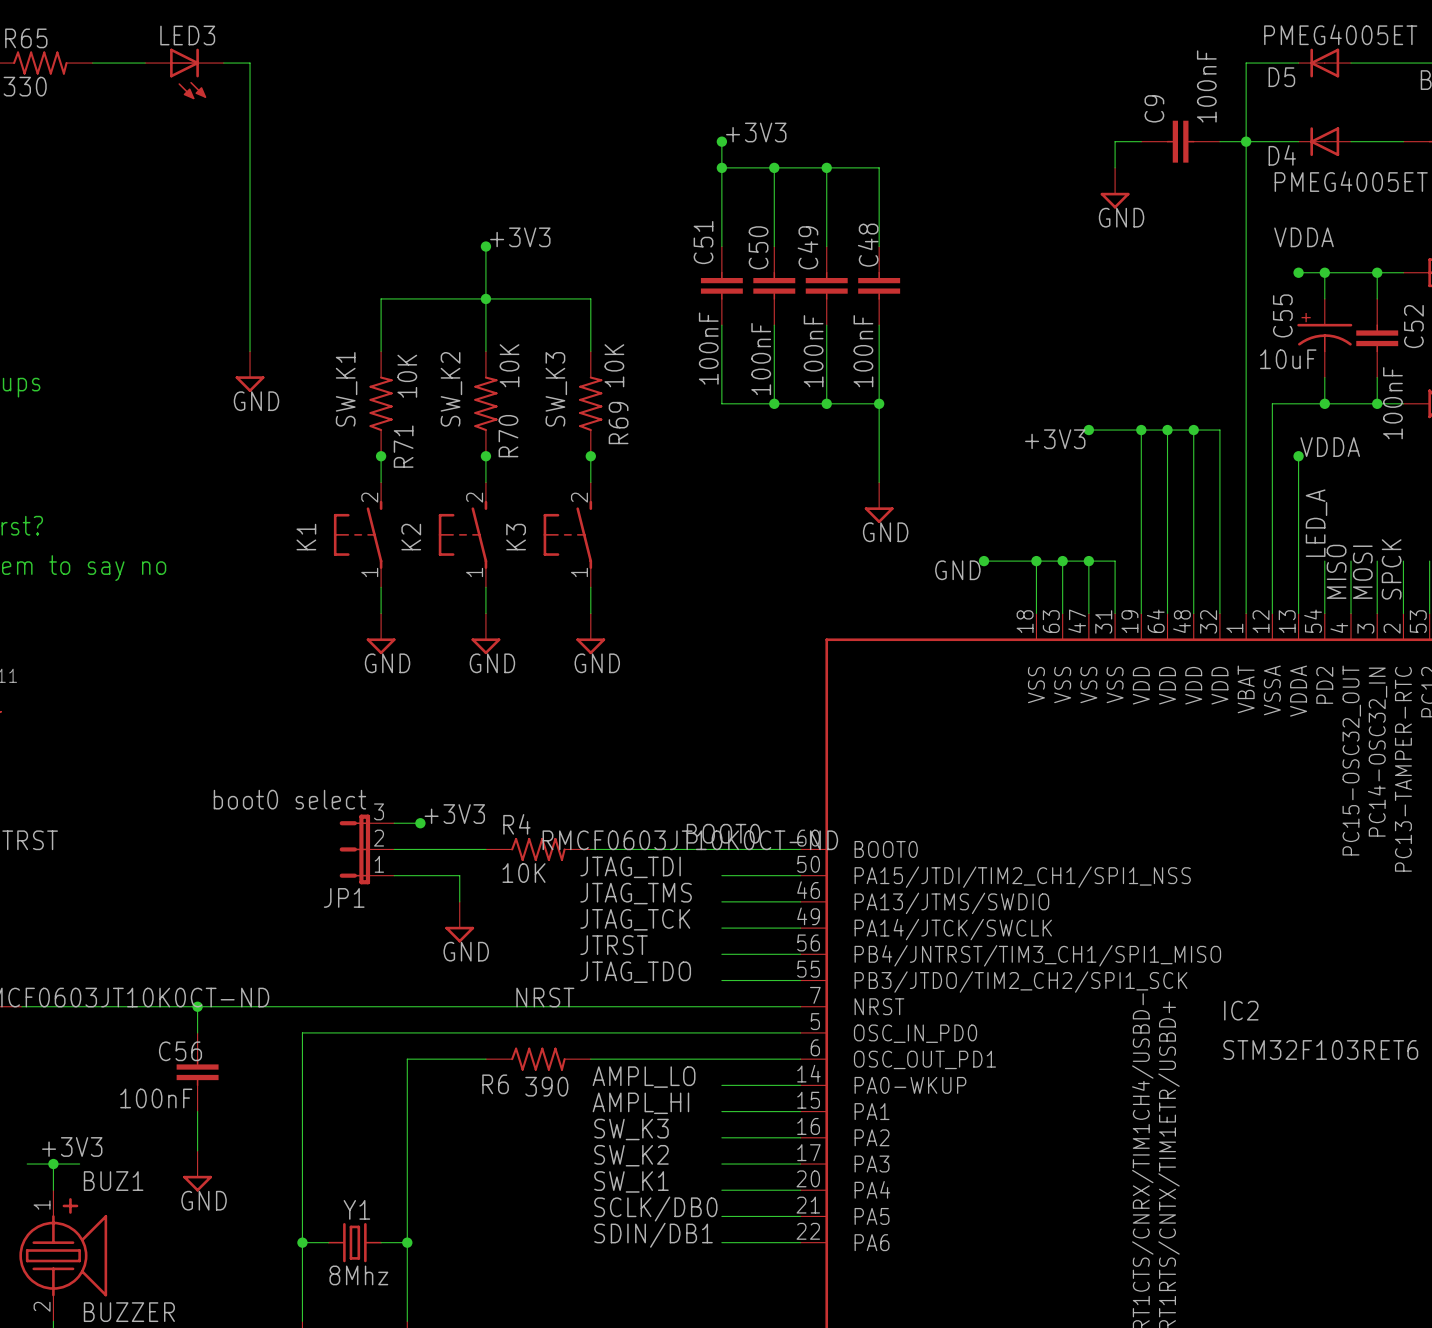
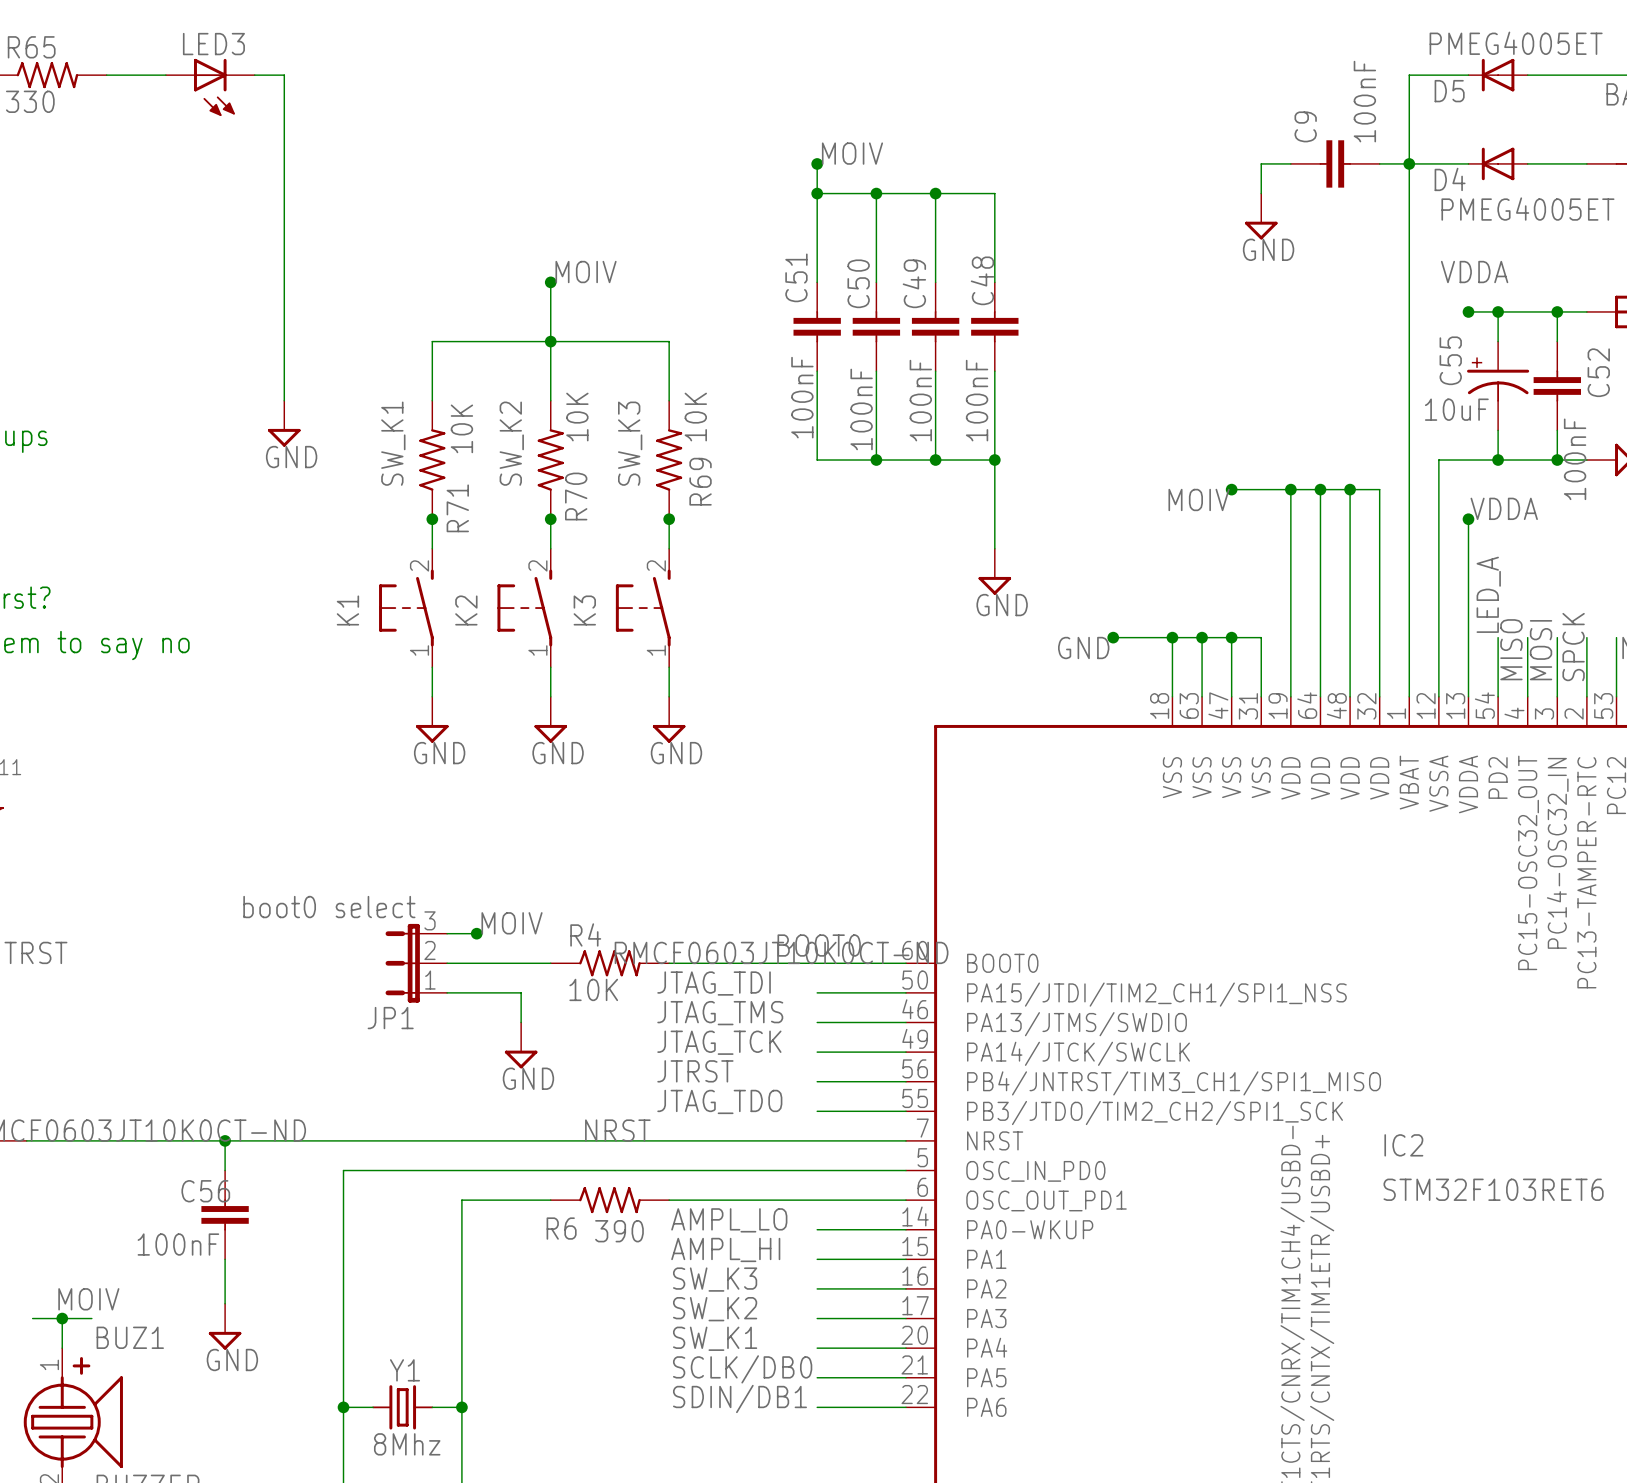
label: +3V3 (756, 132) -> MOIV (852, 153)
label: +3V3 (520, 237) -> MOIV (586, 272)
label: +3V3 (1055, 439) -> MOIV (1199, 499)
label: +3V3 (454, 814) -> MOIV (512, 923)
label: +3V3 (72, 1146) -> MOIV (88, 1299)

